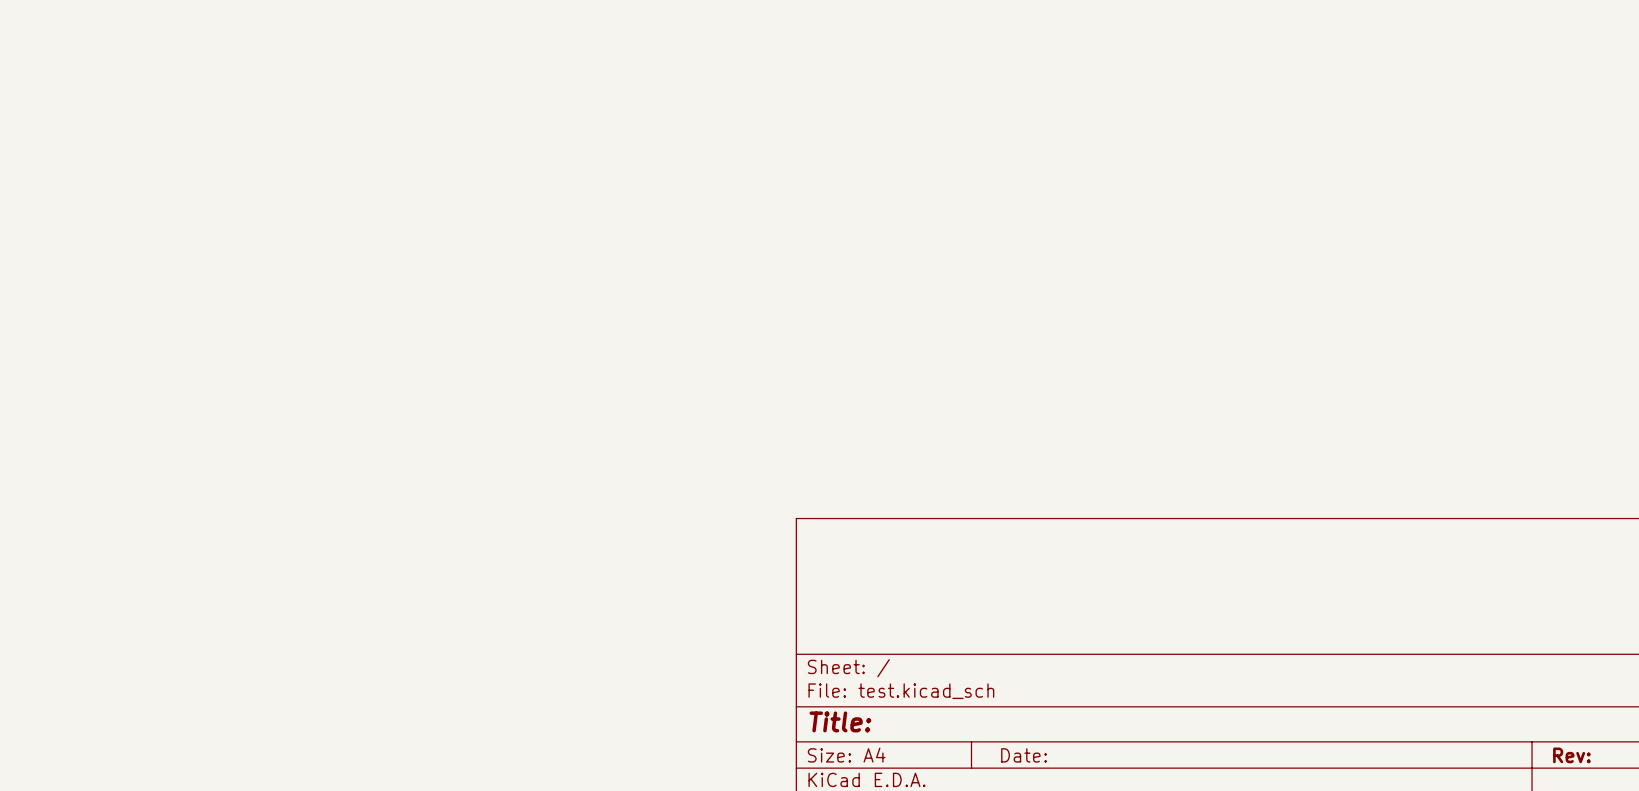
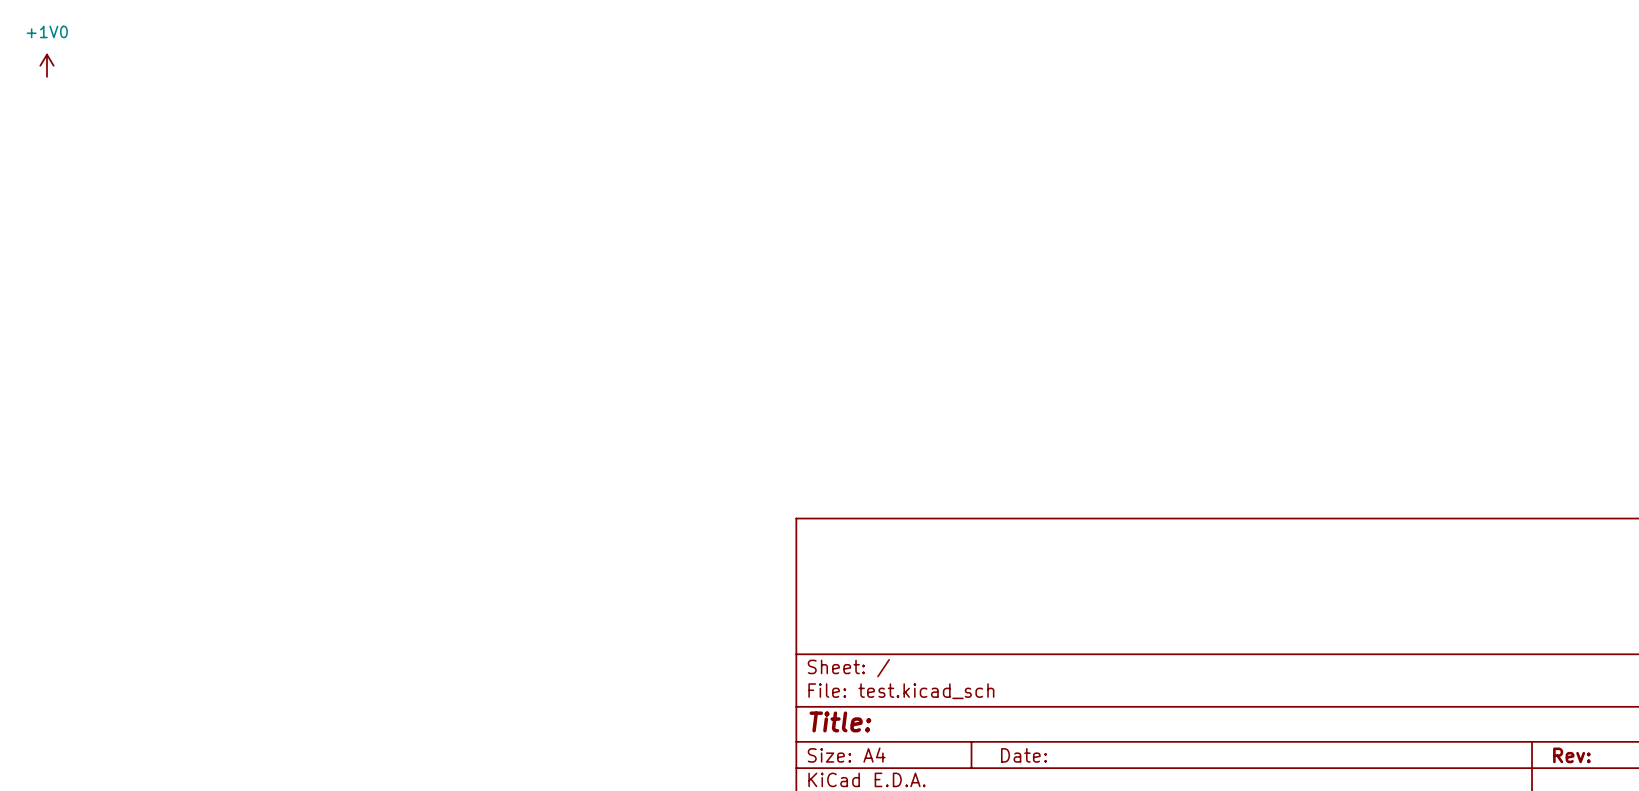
power symbol: none -> +1V0 (46, 65)

